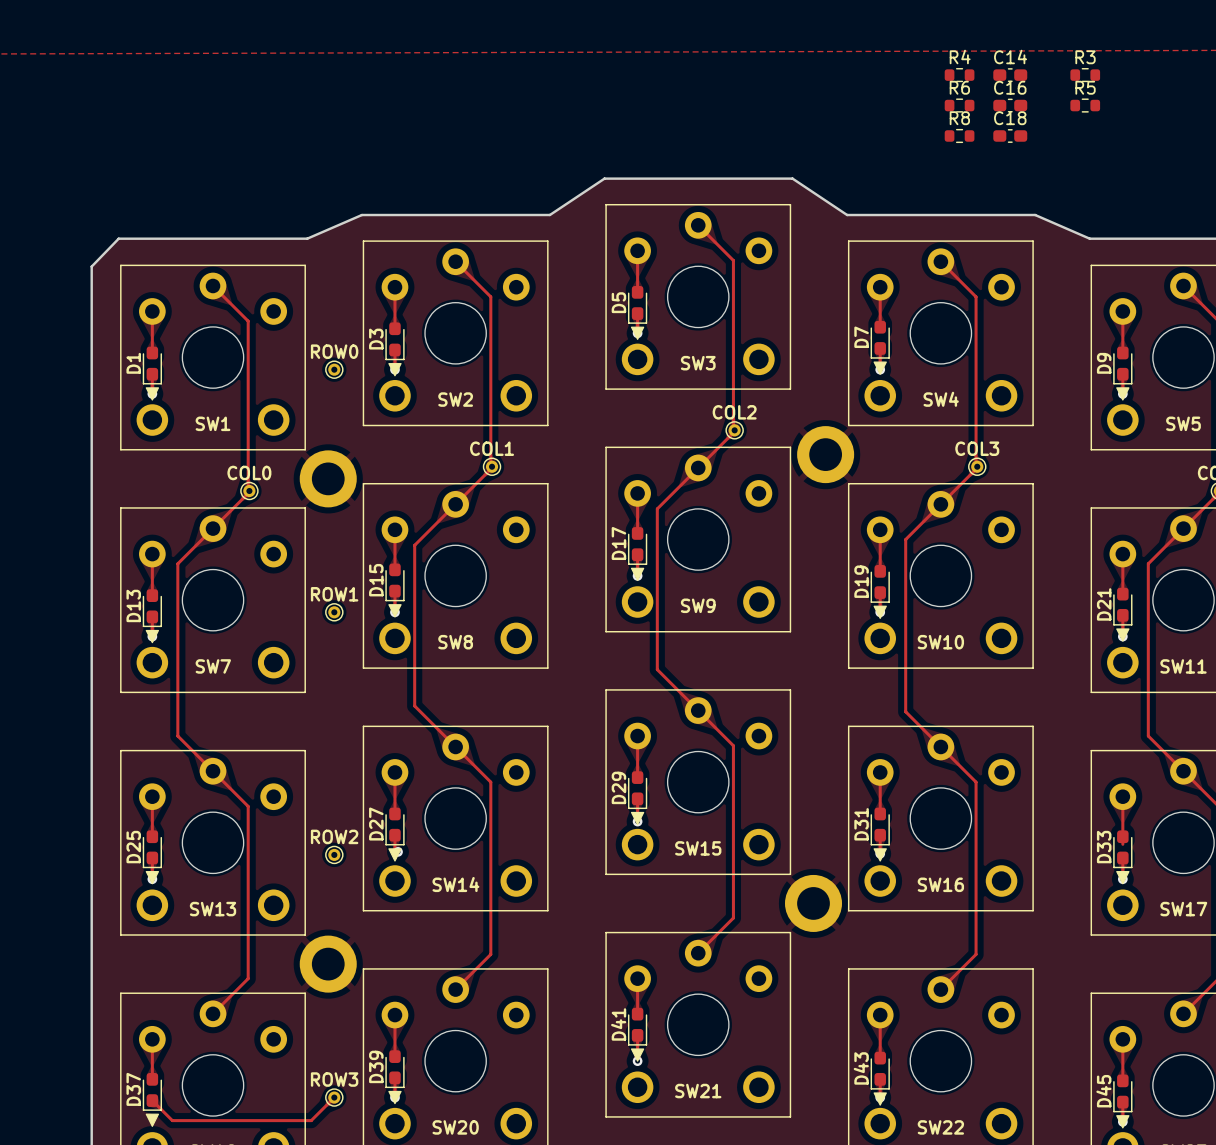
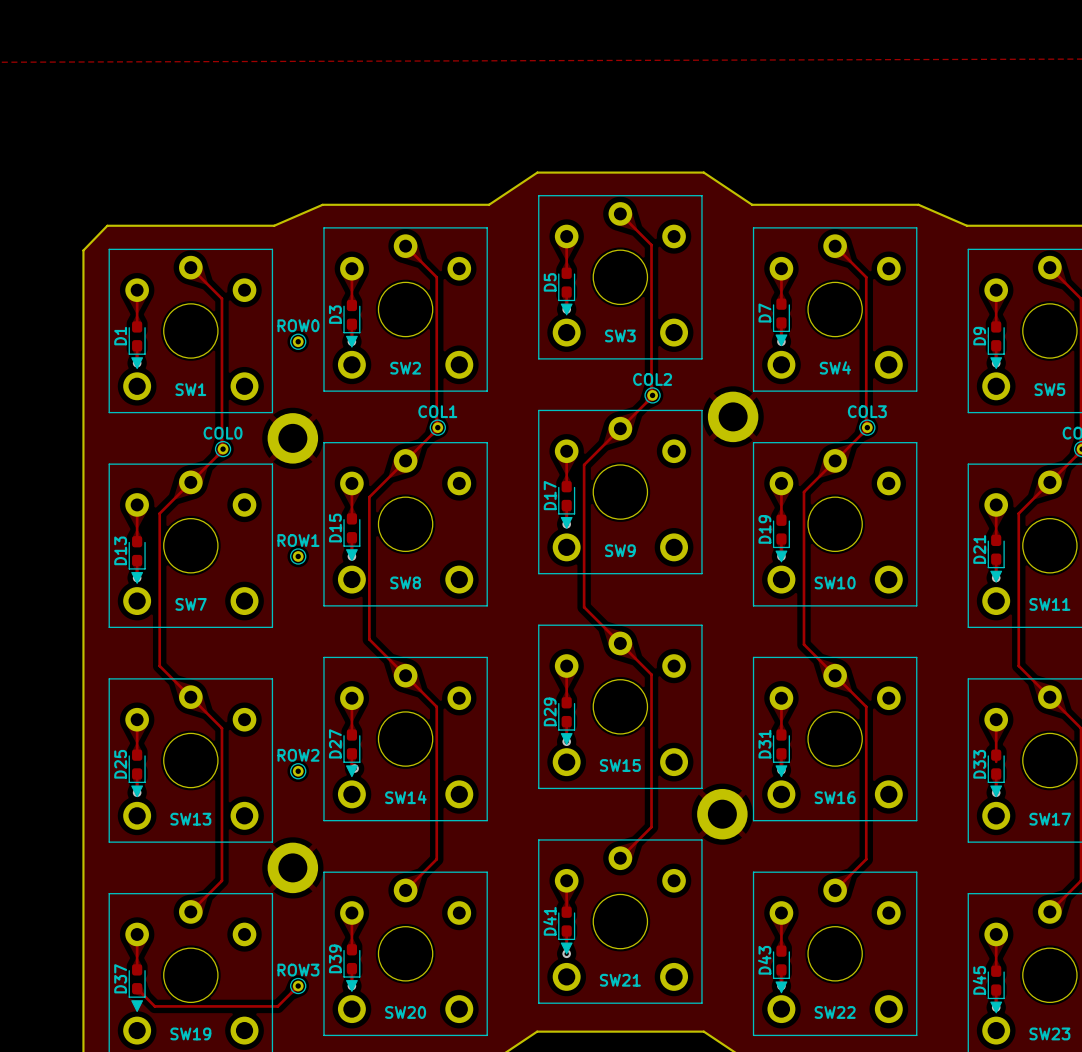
R4: (959, 75) -> none
C14: (1010, 75) -> none
R3: (1085, 75) -> none
R6: (959, 105) -> none
C16: (1010, 105) -> none
R5: (1085, 105) -> none
R8: (959, 135) -> none
C18: (1010, 135) -> none

